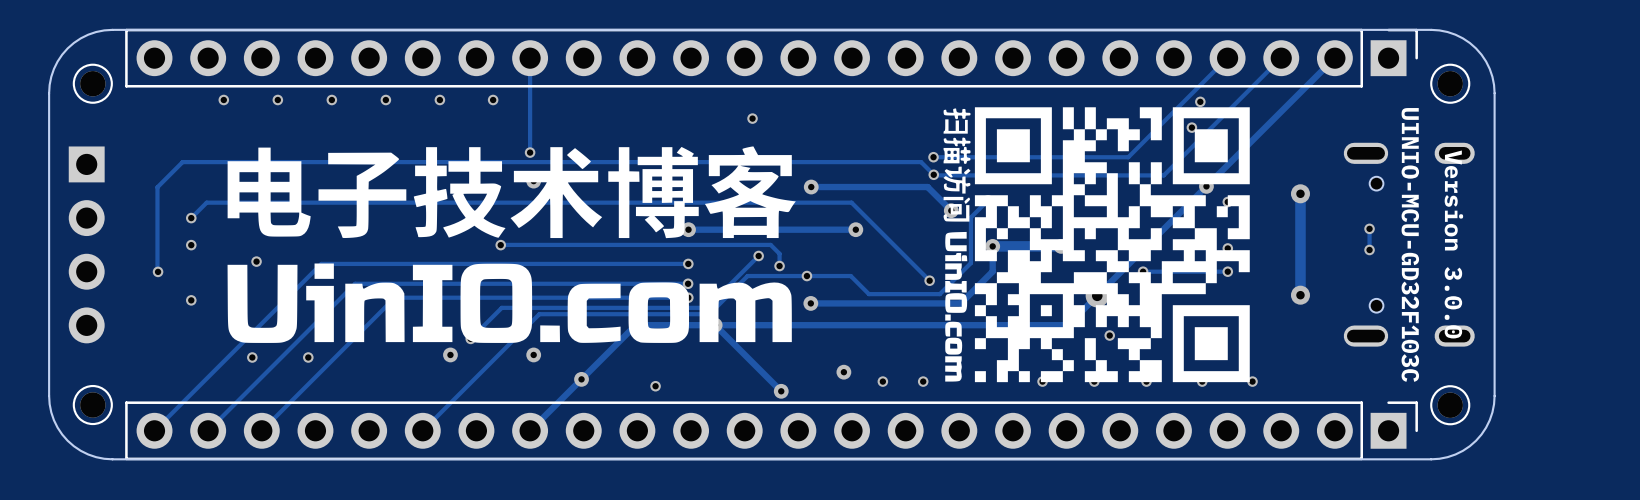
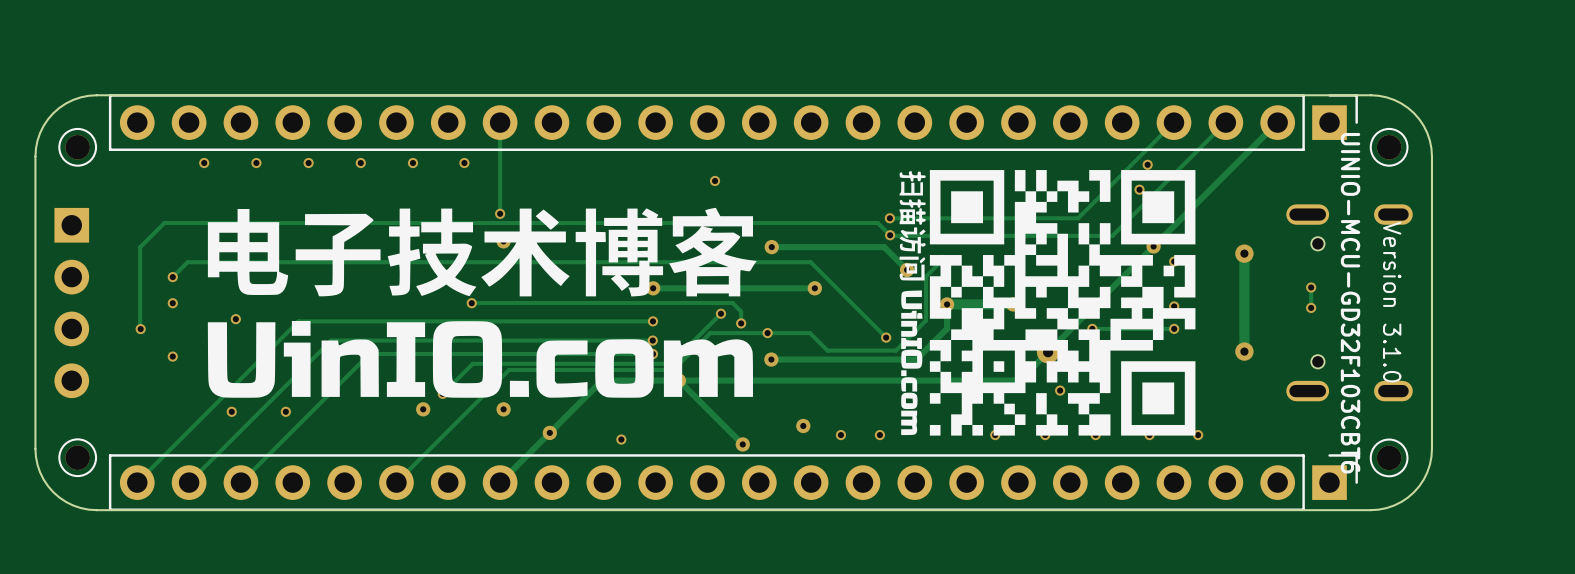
text: UINIO-MCU-GD32F103C (1410, 244) -> UINIO-MCU-GD32F103CBT6 (1350, 303)
text: Version 3.0.0 (1453, 244) -> Version 3.1.0 (1392, 302)

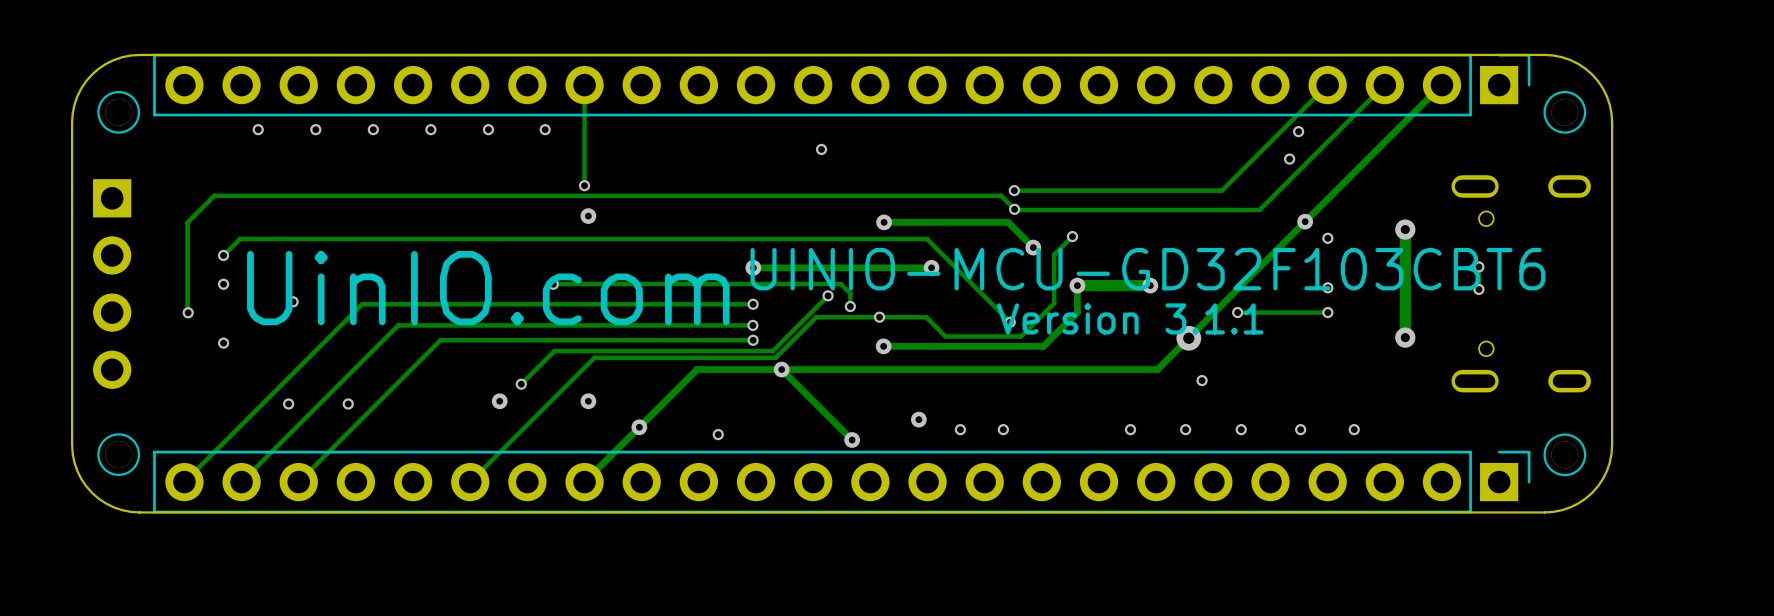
drawing: [899, 170, 1196, 436] -> none
drawing: [207, 207, 757, 398] -> none
text: none -> UINIO-MCU-GD32F103CBT6 (1147, 269)
text: Version 3.1.0 (1392, 302) -> none
text: UINIO-MCU-GD32F103CBT6 (1350, 303) -> none
text: none -> UinIO.com (488, 288)
text: none -> Version 3.1.1 (1130, 318)

